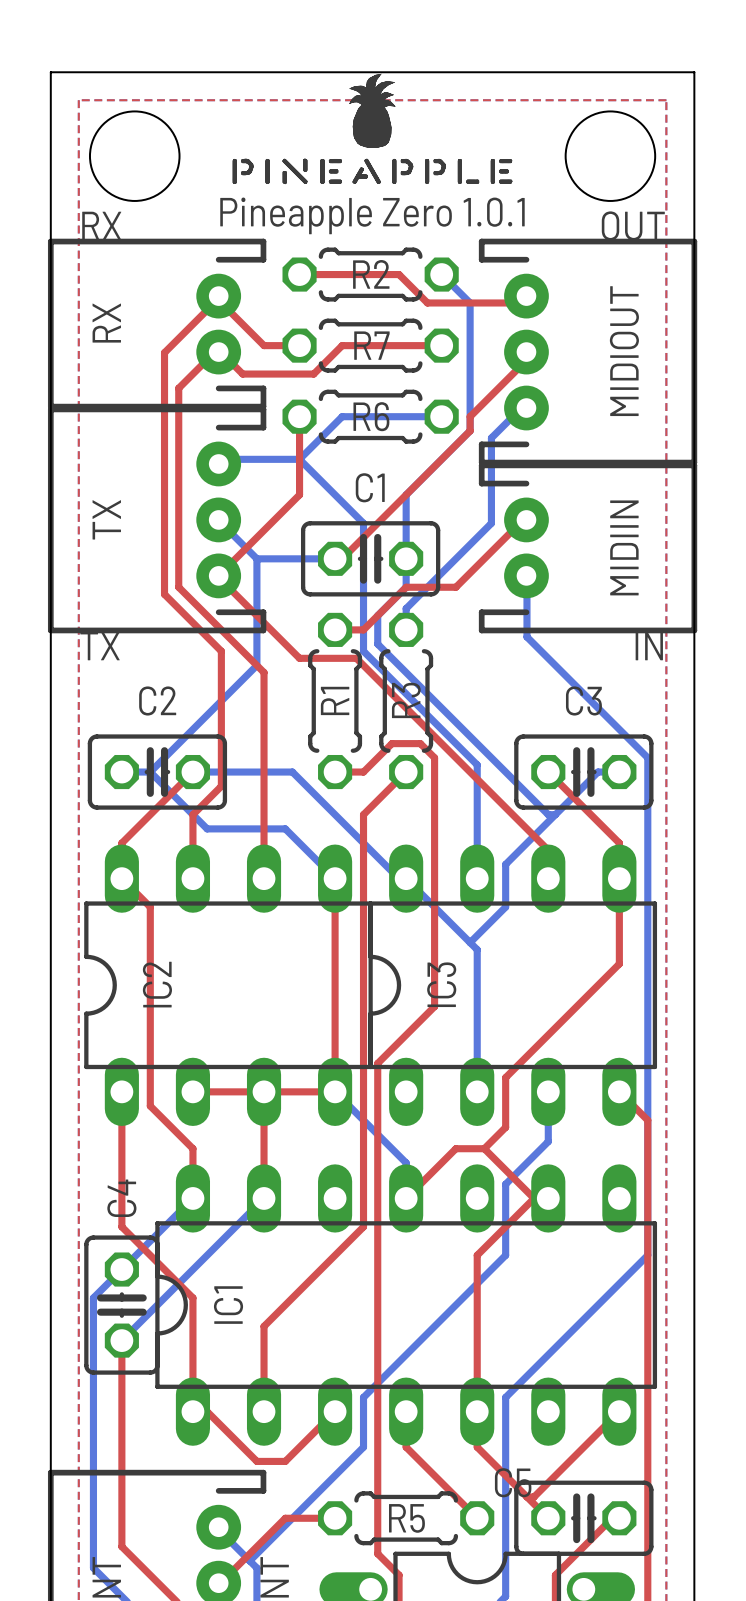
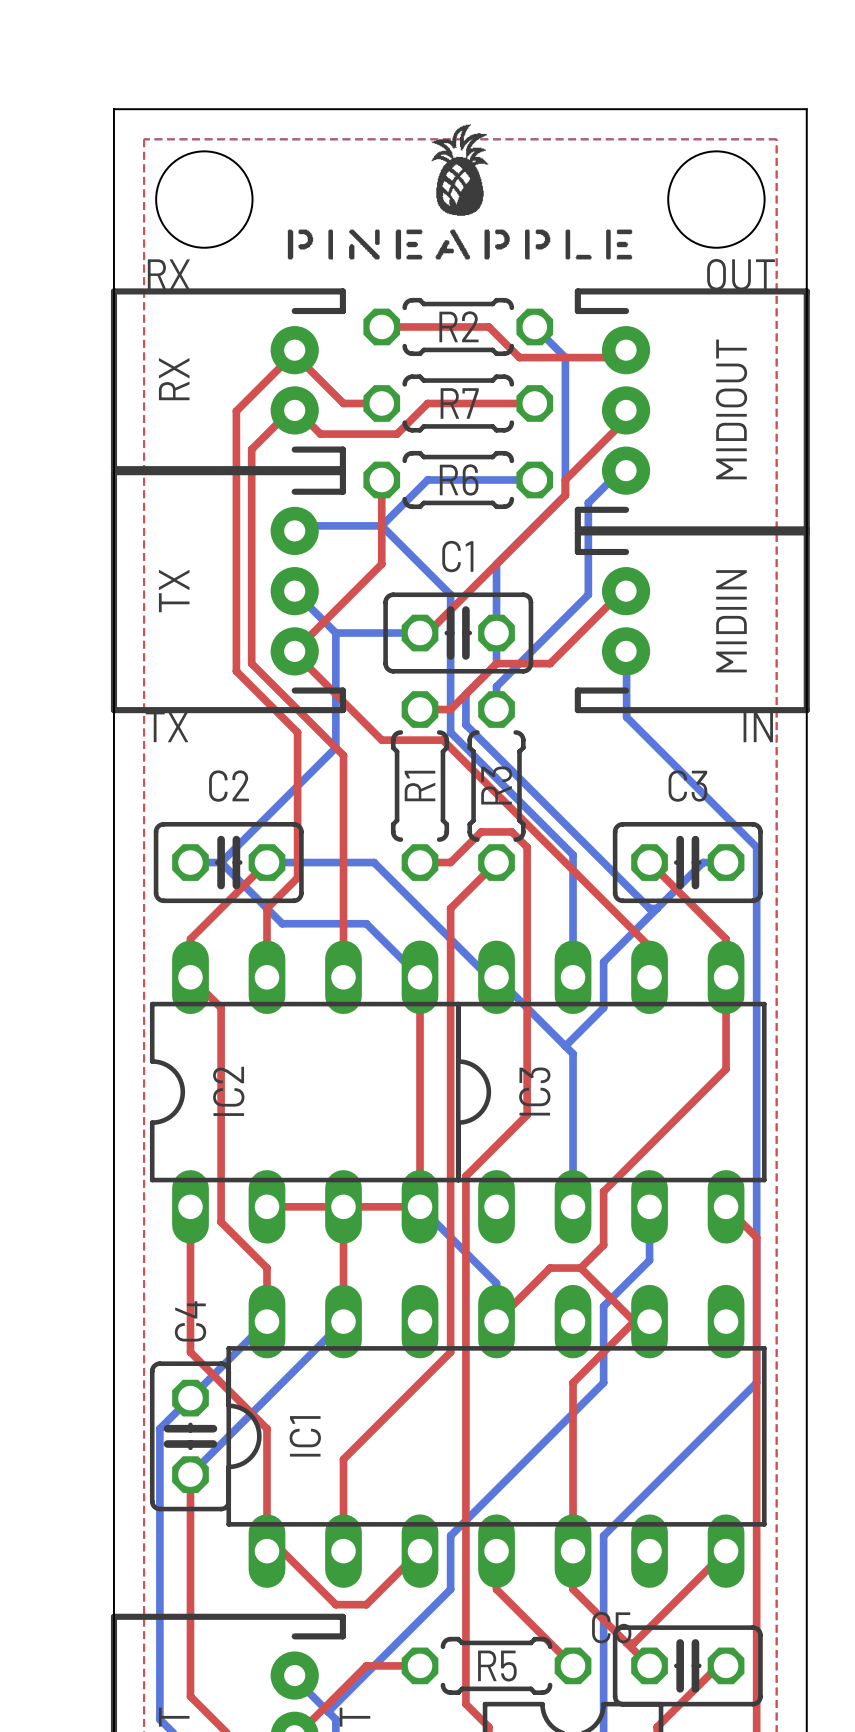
drawing shape: [232, 73, 513, 185] -> [287, 124, 633, 260]
text: Pineapple Zero 1.0.1 (372, 215) -> none

